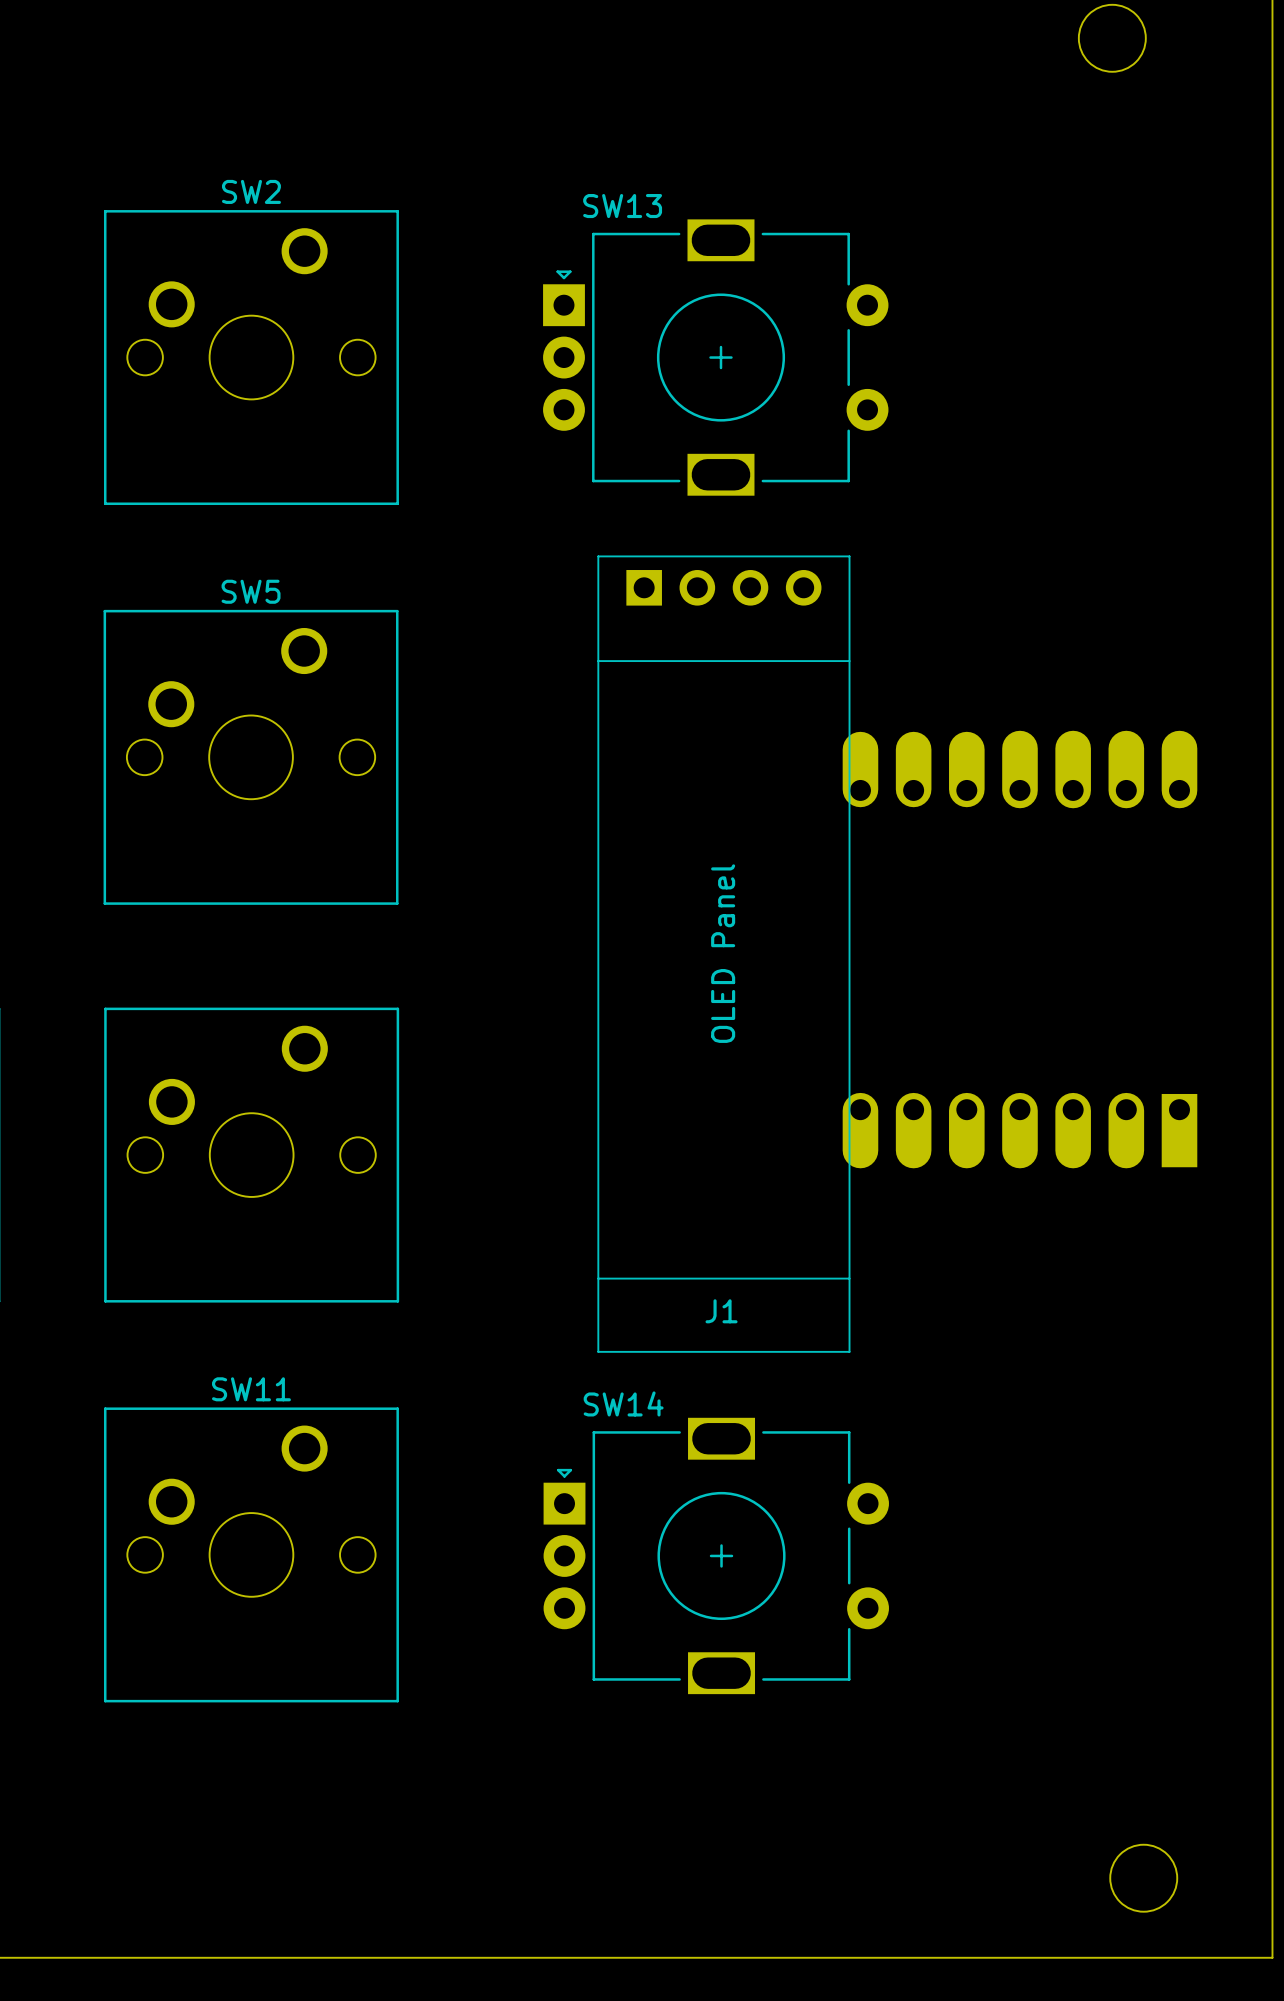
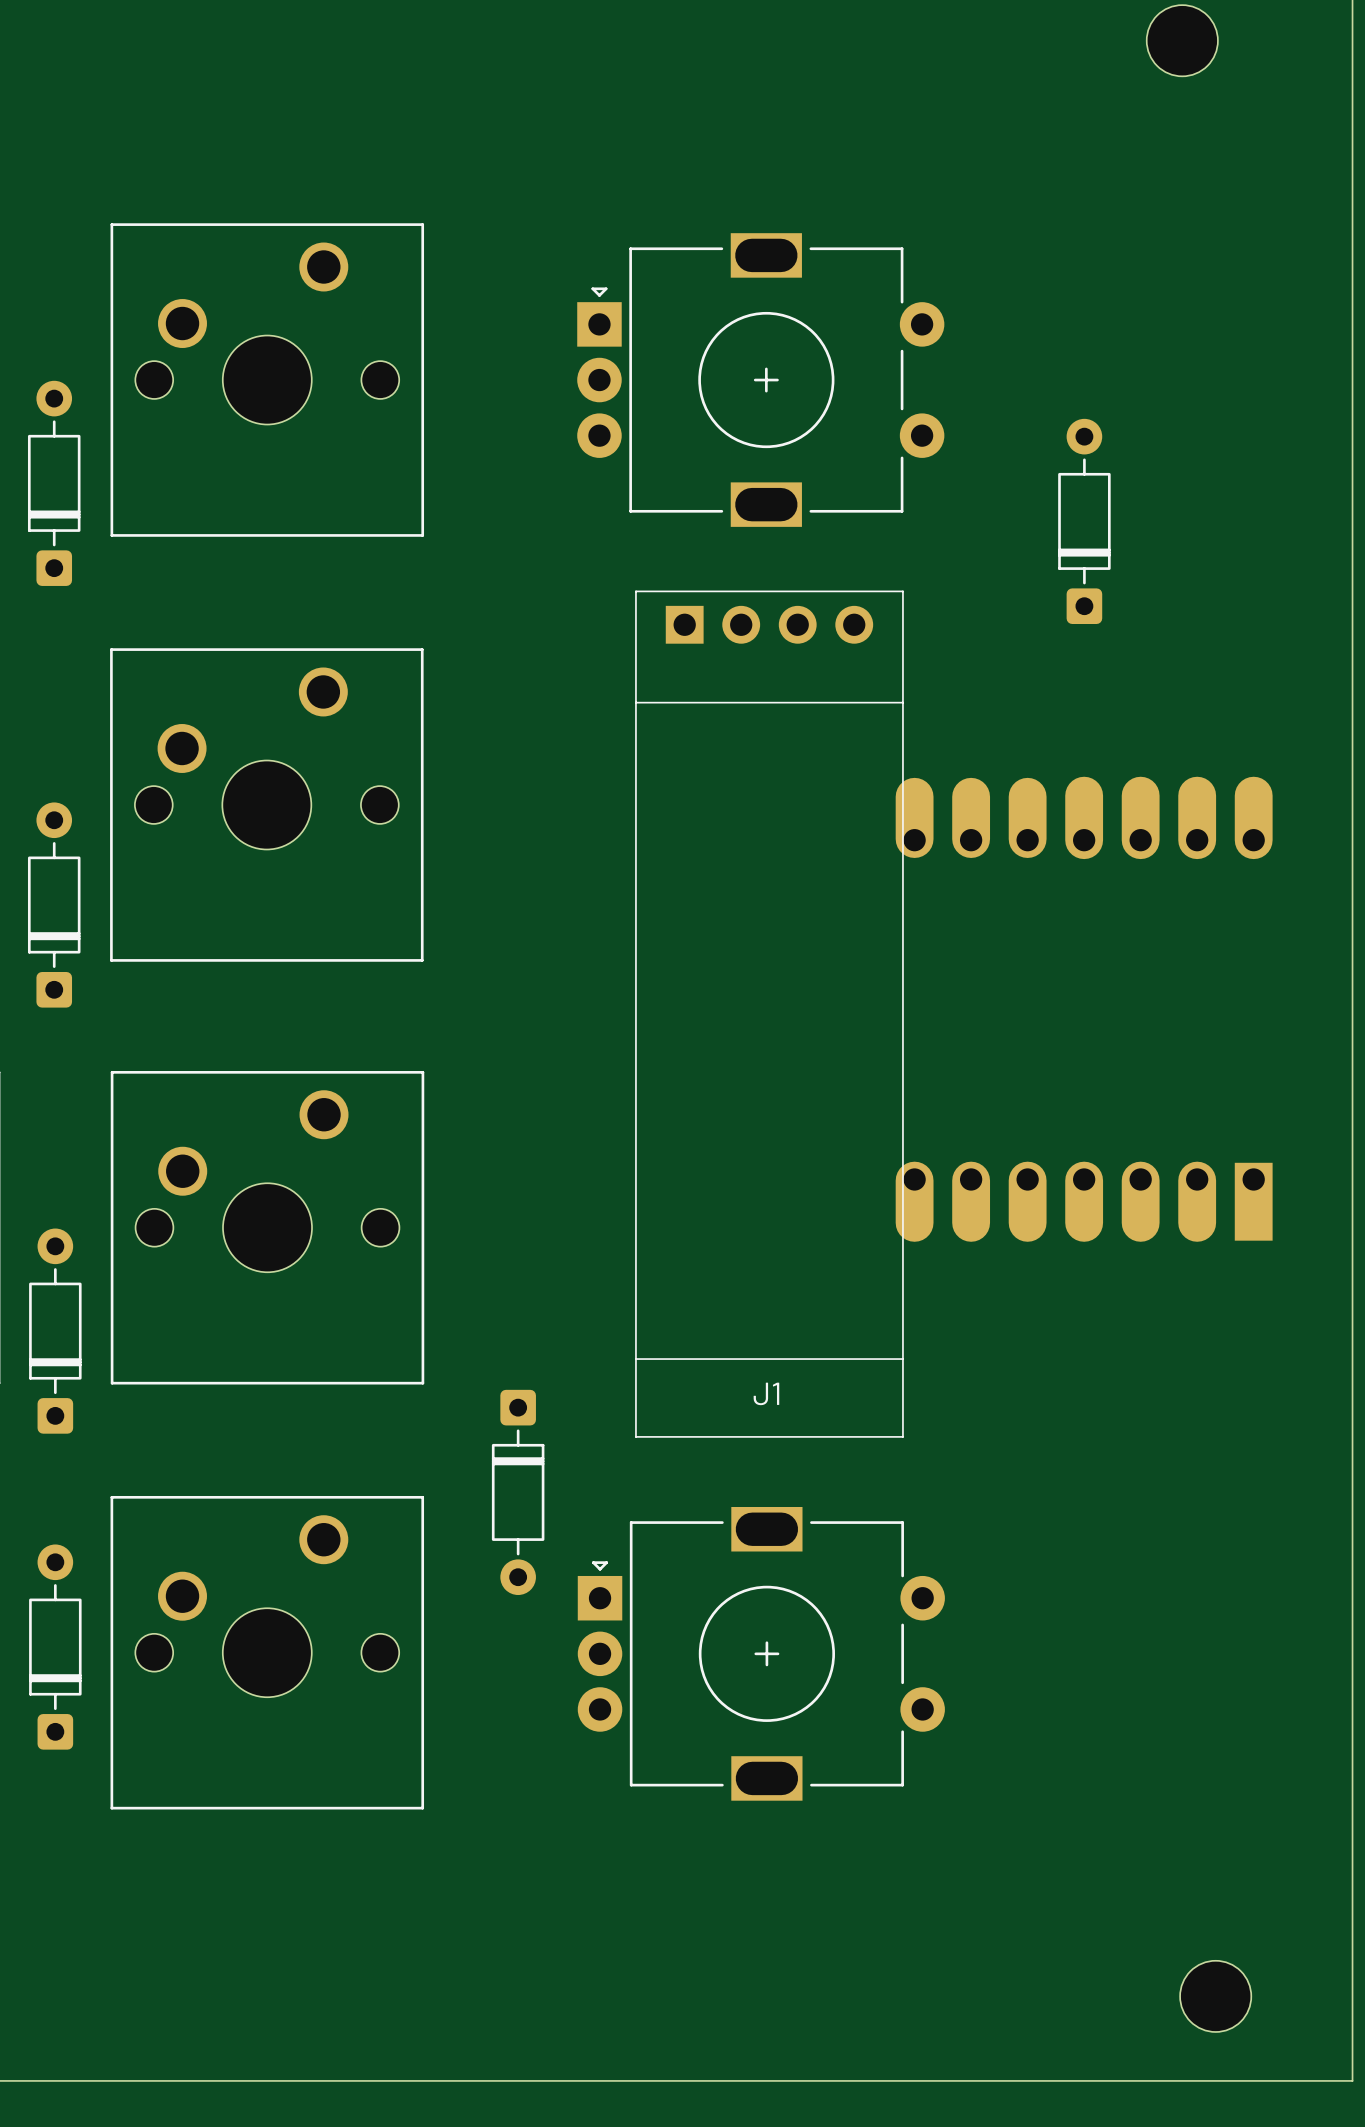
SW2 name: SW2 (251, 191) -> none
SW13 name: SW13 (622, 206) -> none
part: none -> (54, 483)
part: none -> (1084, 521)
SW5 name: SW5 (251, 591) -> none
part: none -> (54, 905)
J1 text: OLED Panel (723, 953) -> none
part: none -> (55, 1331)
SW11 name: SW11 (251, 1389) -> none
SW14 name: SW14 (623, 1403) -> none
part: none -> (518, 1492)
part: none -> (55, 1647)

